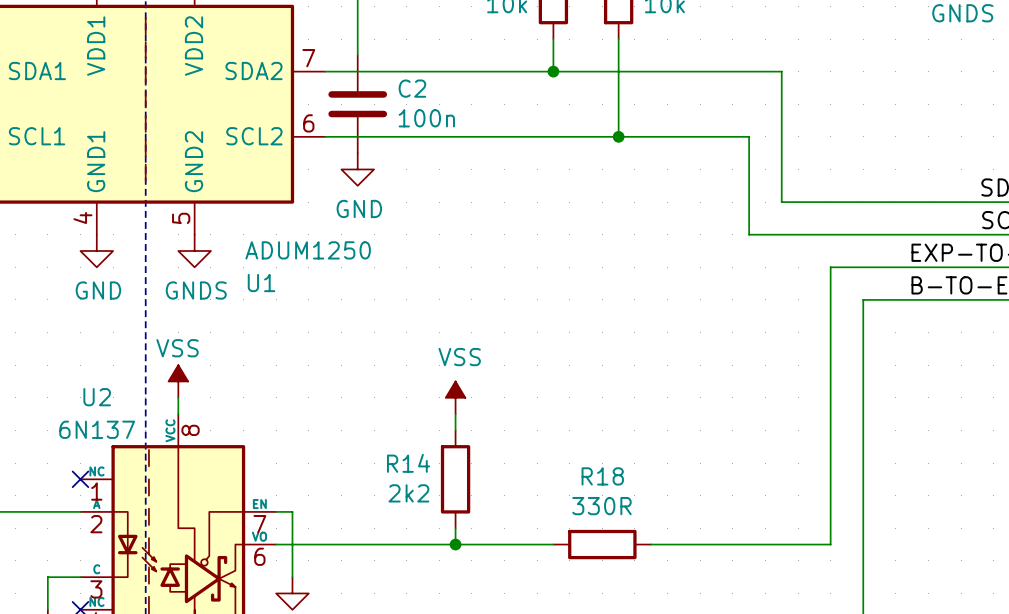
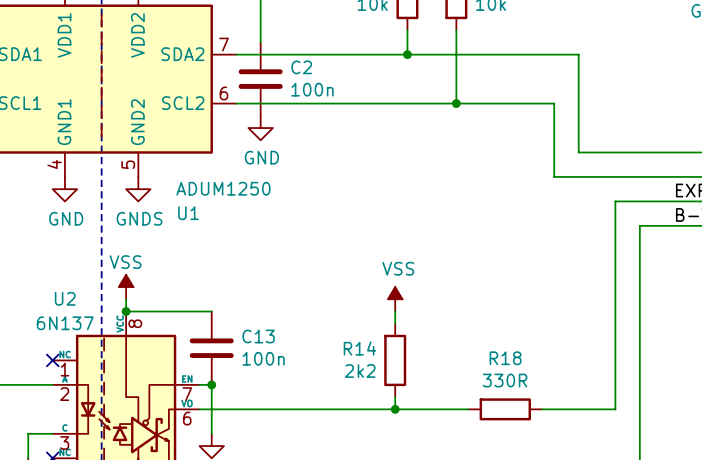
power symbol position: VSS (455, 397) -> VSS (395, 299)
wire: none -> (126, 311) (211, 311)
junction: none -> (126, 311)
wire: (455, 414) (455, 430) -> (395, 311) (395, 323)
C13: none -> 100n (211, 348)
R14 position: (455, 479) -> (395, 360)
junction: none -> (211, 384)
wire: (455, 528) (455, 544) -> (395, 397) (395, 409)
junction: (455, 544) -> none
junction: none -> (395, 409)
R18 position: (602, 544) -> (505, 409)
wire: (651, 544) (732, 544) -> (407, 409) (468, 409)

